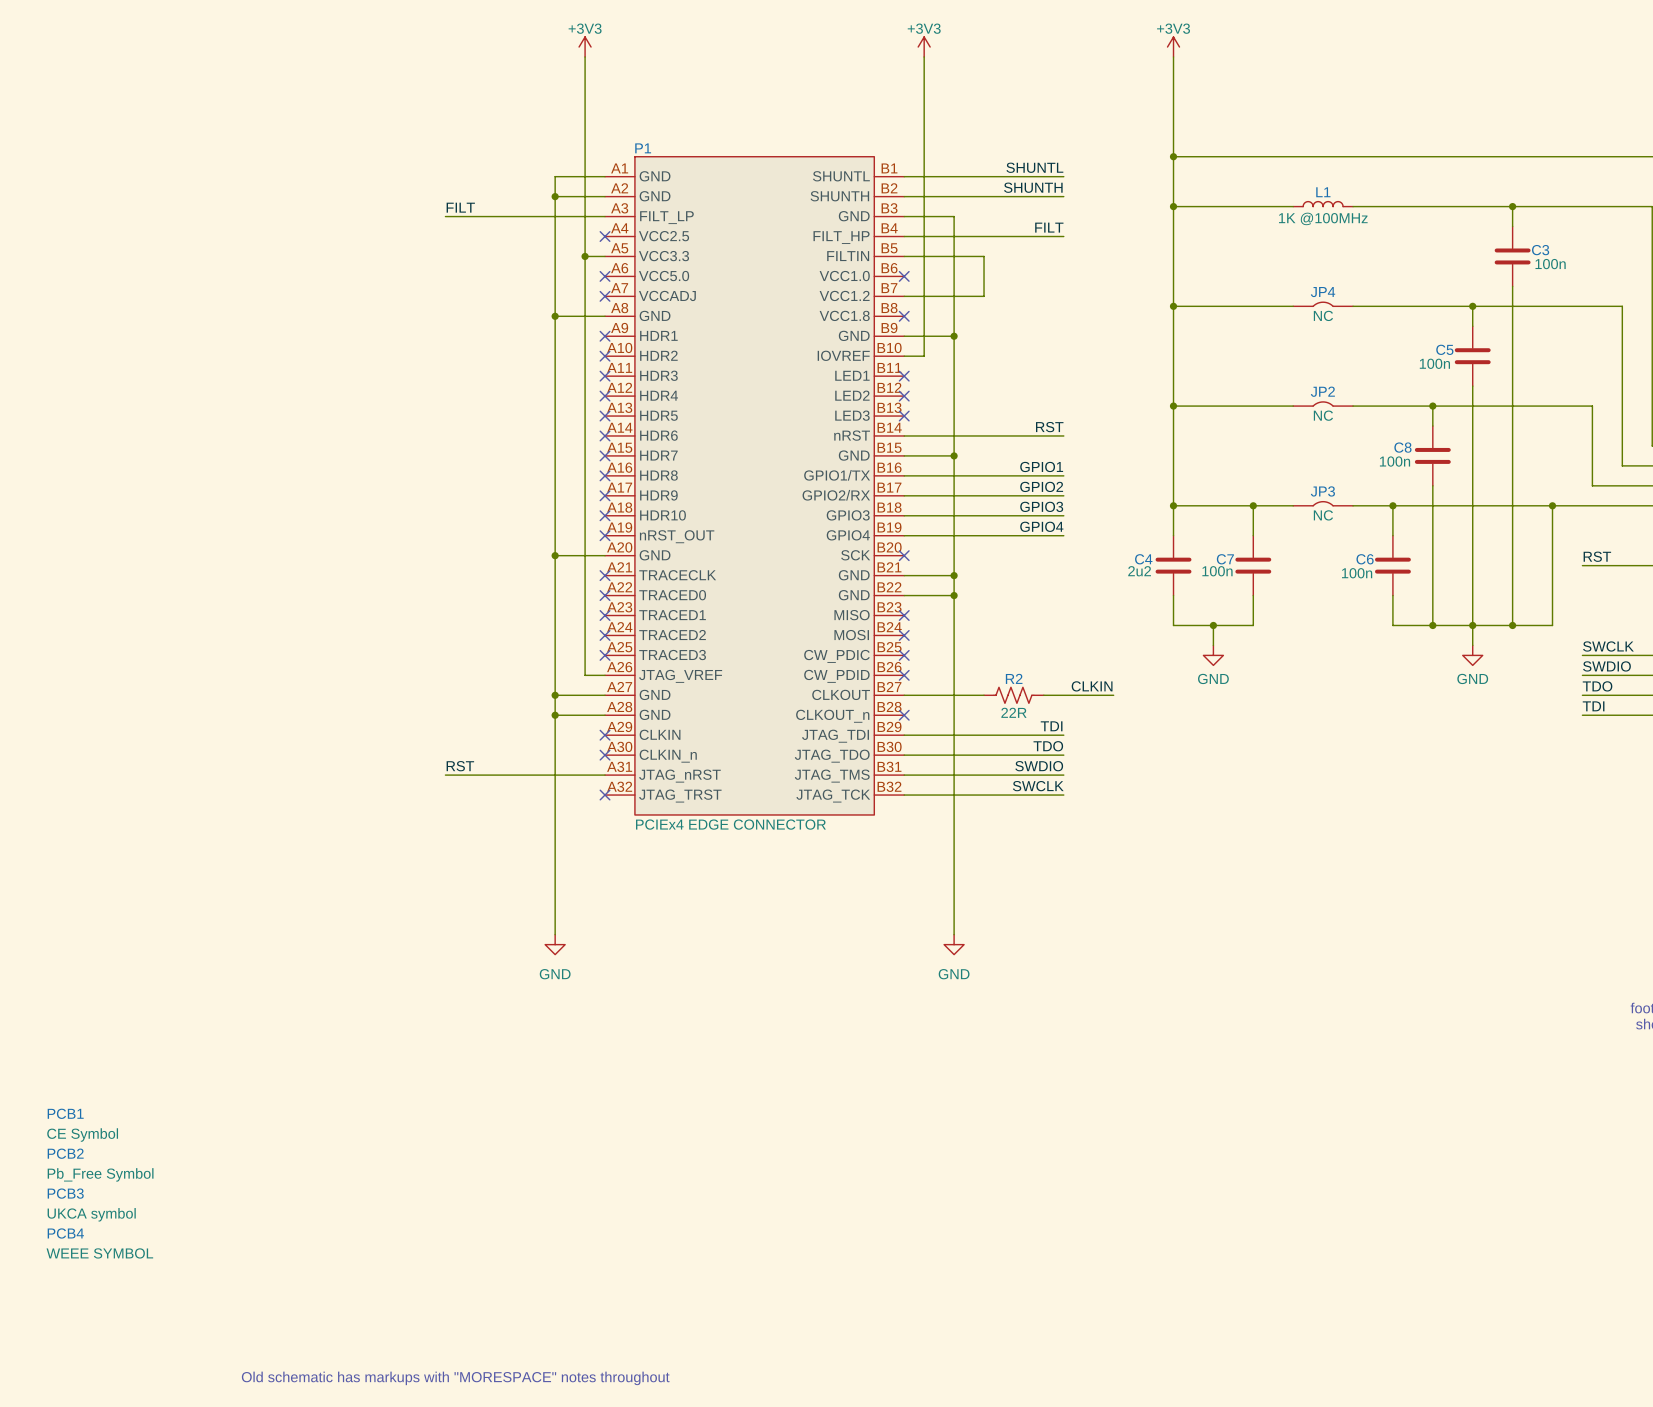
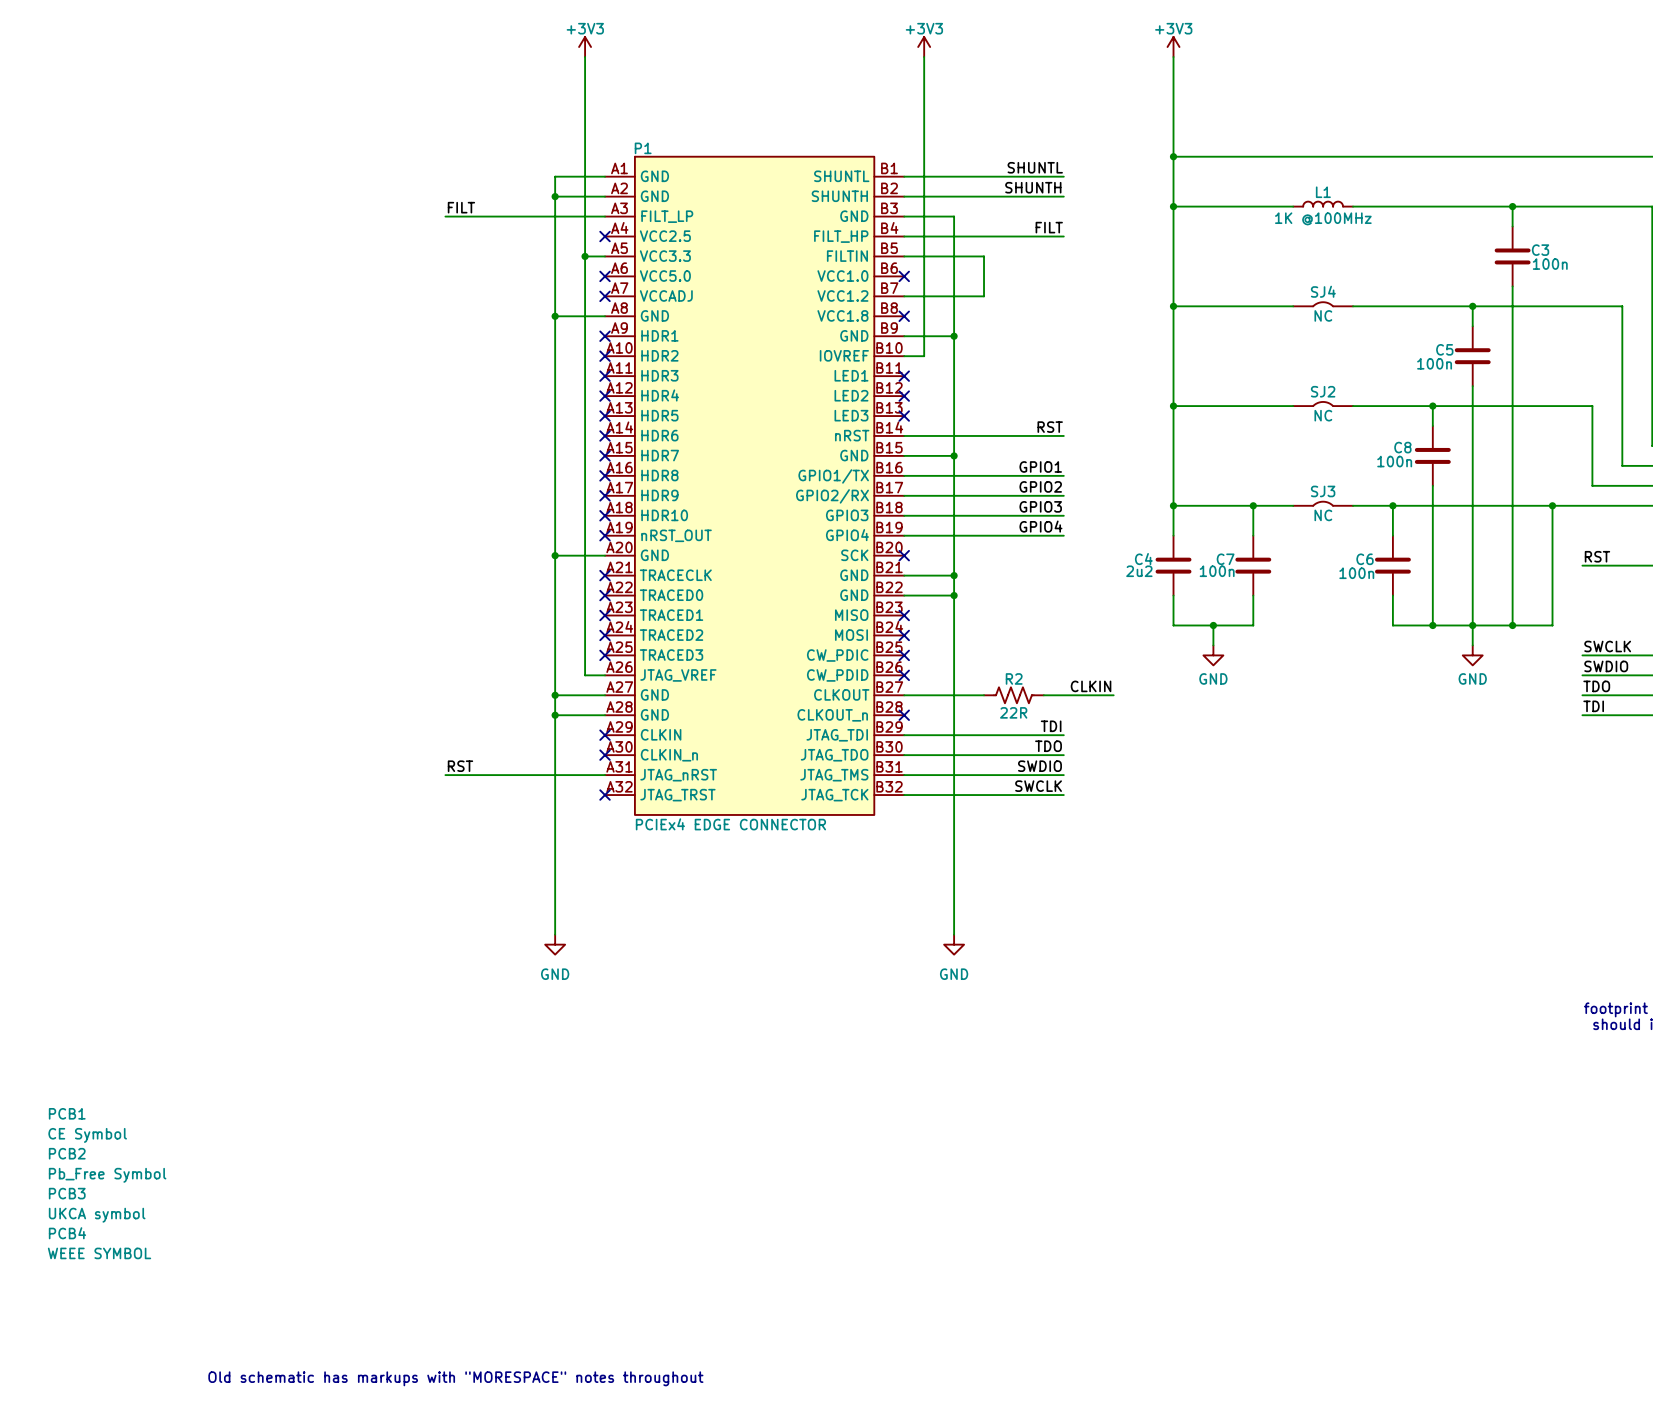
JP4 name: JP4 (1323, 292) -> SJ4 (1323, 291)
JP2 name: JP2 (1322, 391) -> SJ2 (1323, 391)
JP3 name: JP3 (1322, 491) -> SJ3 (1323, 491)

